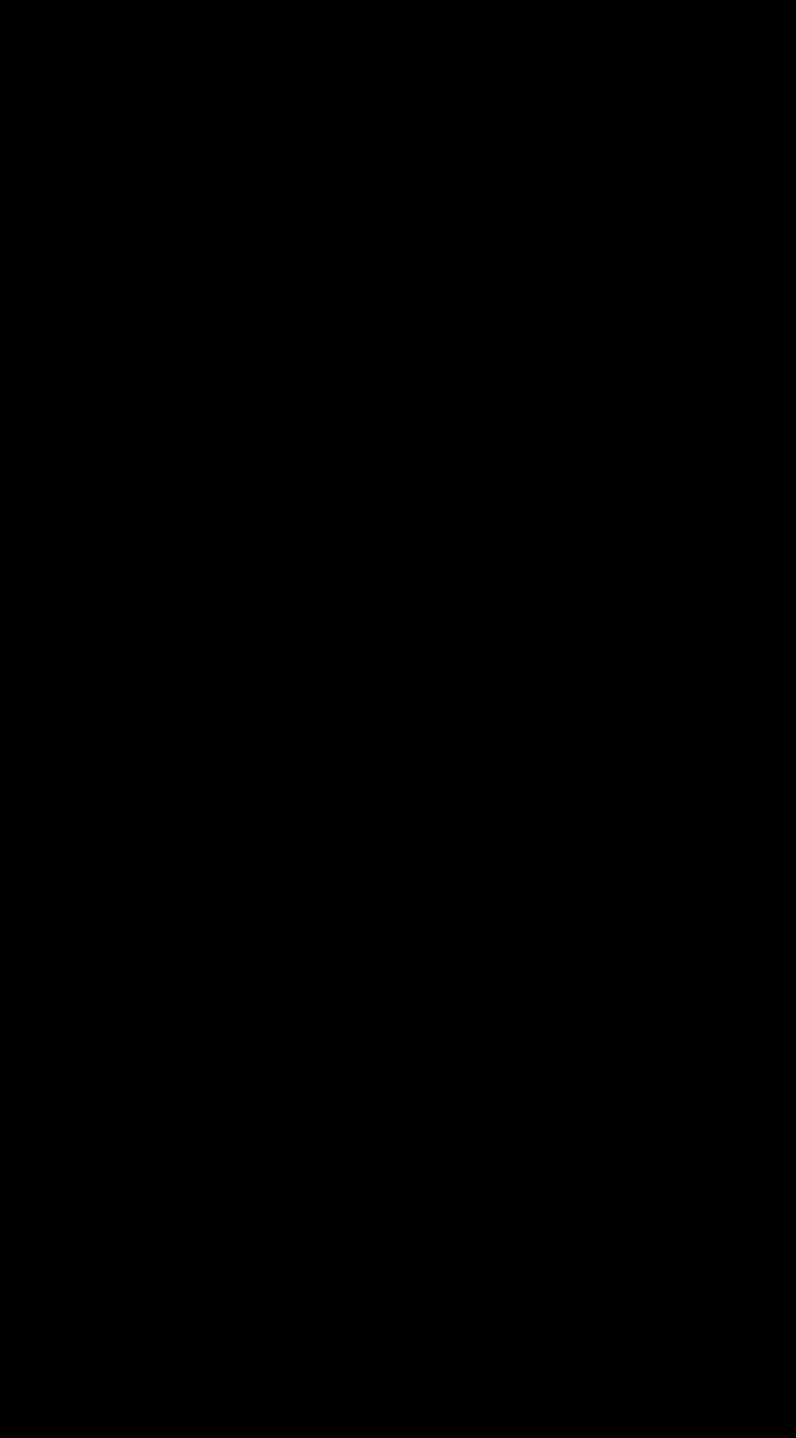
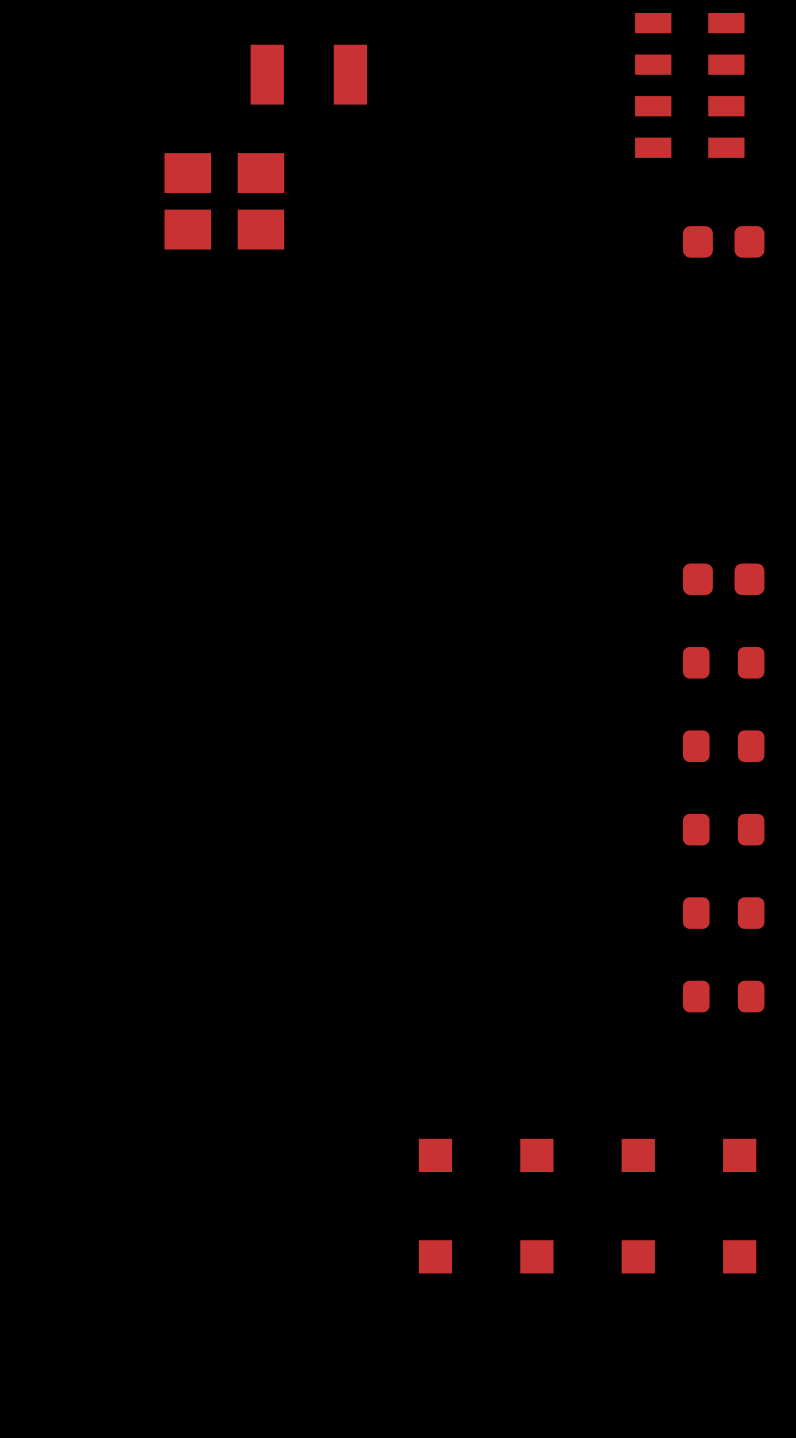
part: none -> (308, 74)
part: none -> (689, 85)
part: none -> (224, 201)
part: none -> (723, 241)
part: none -> (723, 579)
part: none -> (723, 662)
part: none -> (723, 746)
part: none -> (723, 829)
part: none -> (723, 913)
part: none -> (723, 996)
part: none -> (435, 1155)
part: none -> (536, 1155)
part: none -> (638, 1155)
part: none -> (739, 1155)
part: none -> (435, 1256)
part: none -> (536, 1256)
part: none -> (638, 1256)
part: none -> (739, 1256)

